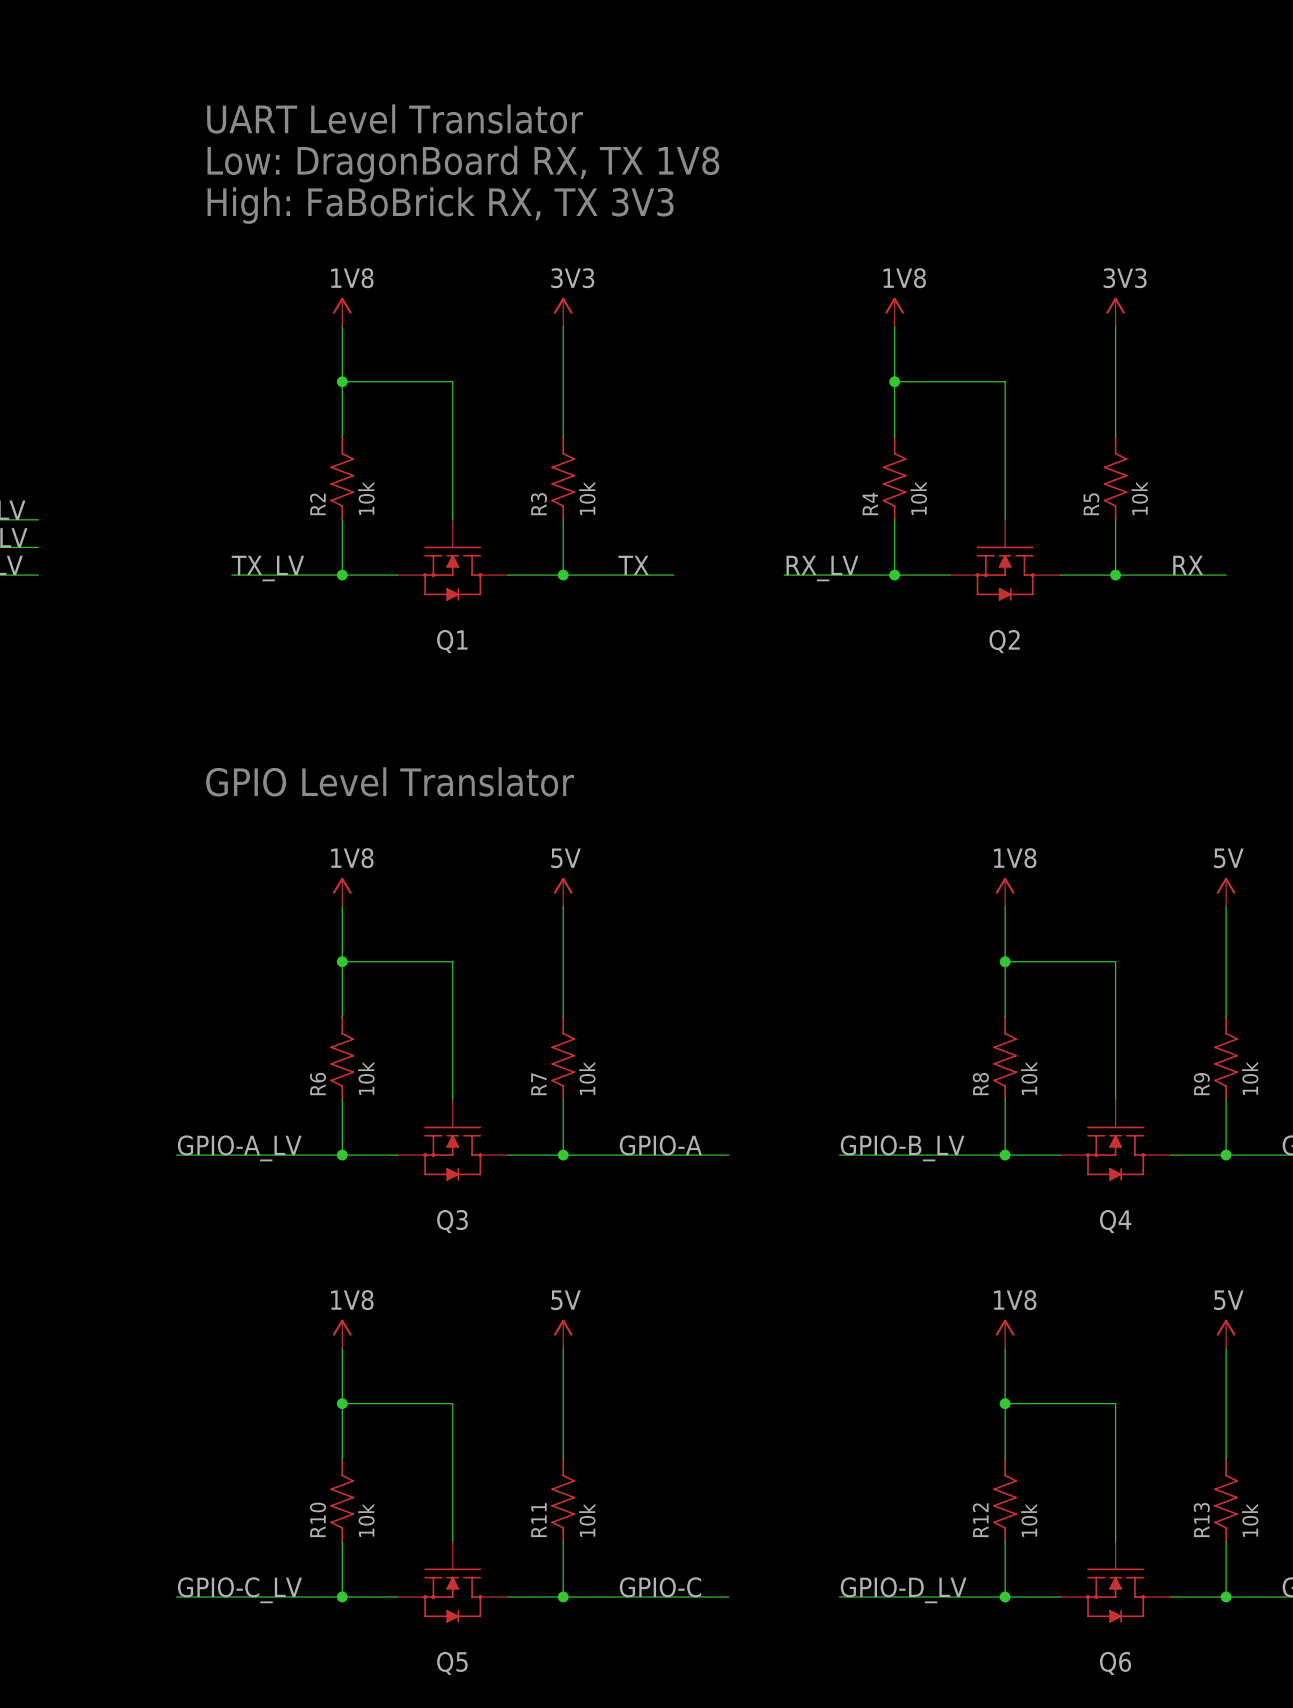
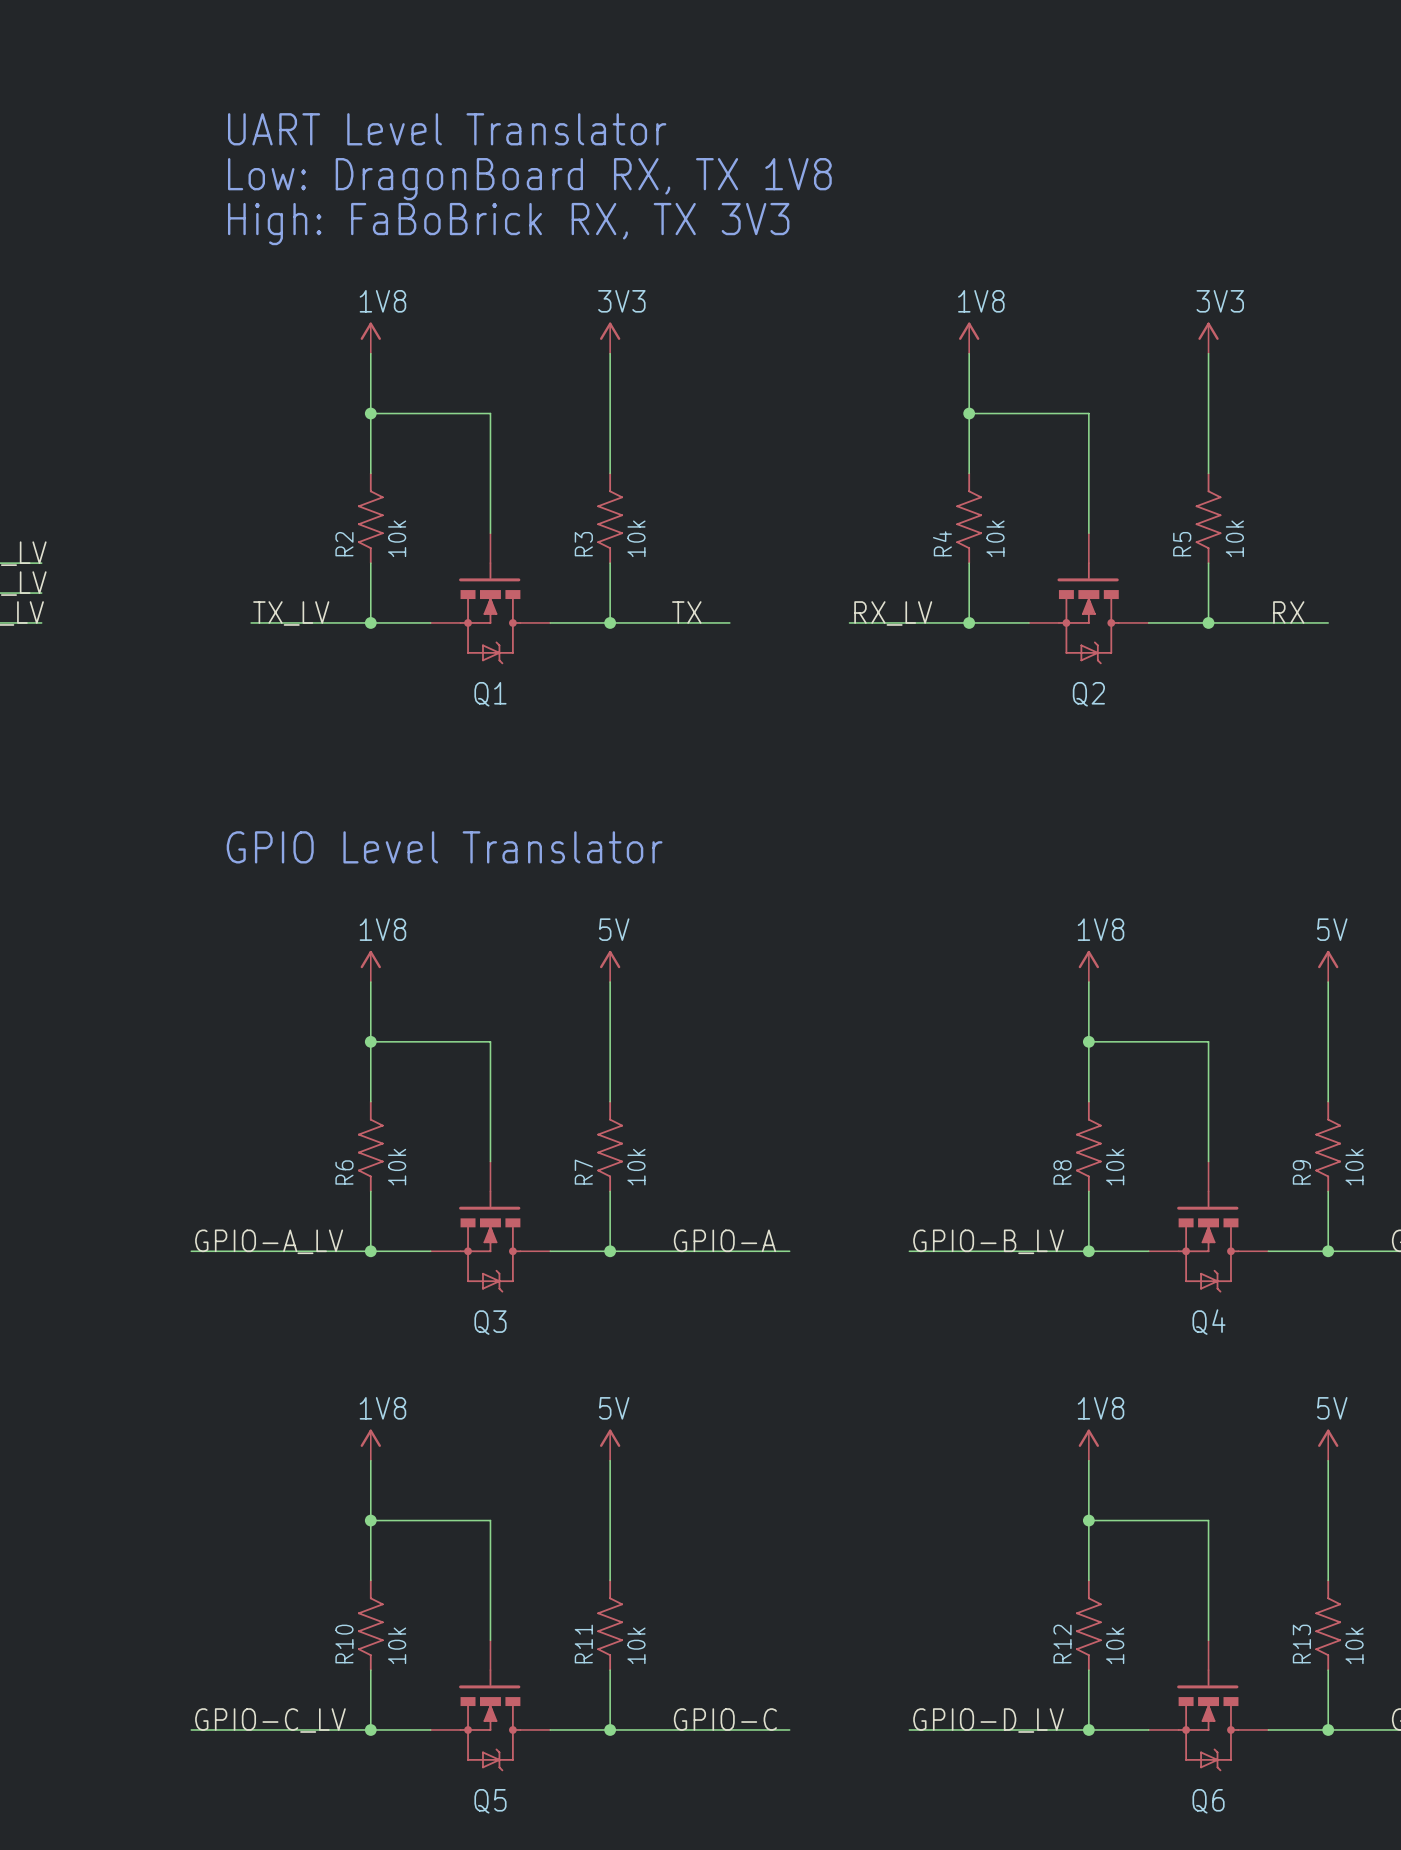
Q1 symbol: [397, 519, 509, 601] -> [430, 533, 551, 665]
Q2 symbol: [949, 519, 1061, 601] -> [1029, 533, 1149, 665]
Q3 symbol: [397, 1099, 509, 1181] -> [430, 1161, 551, 1293]
Q4 symbol: [1060, 1099, 1171, 1181] -> [1148, 1161, 1269, 1293]
Q5 symbol: [397, 1541, 509, 1623] -> [430, 1640, 551, 1772]
Q6 symbol: [1060, 1541, 1171, 1623] -> [1148, 1640, 1269, 1772]

